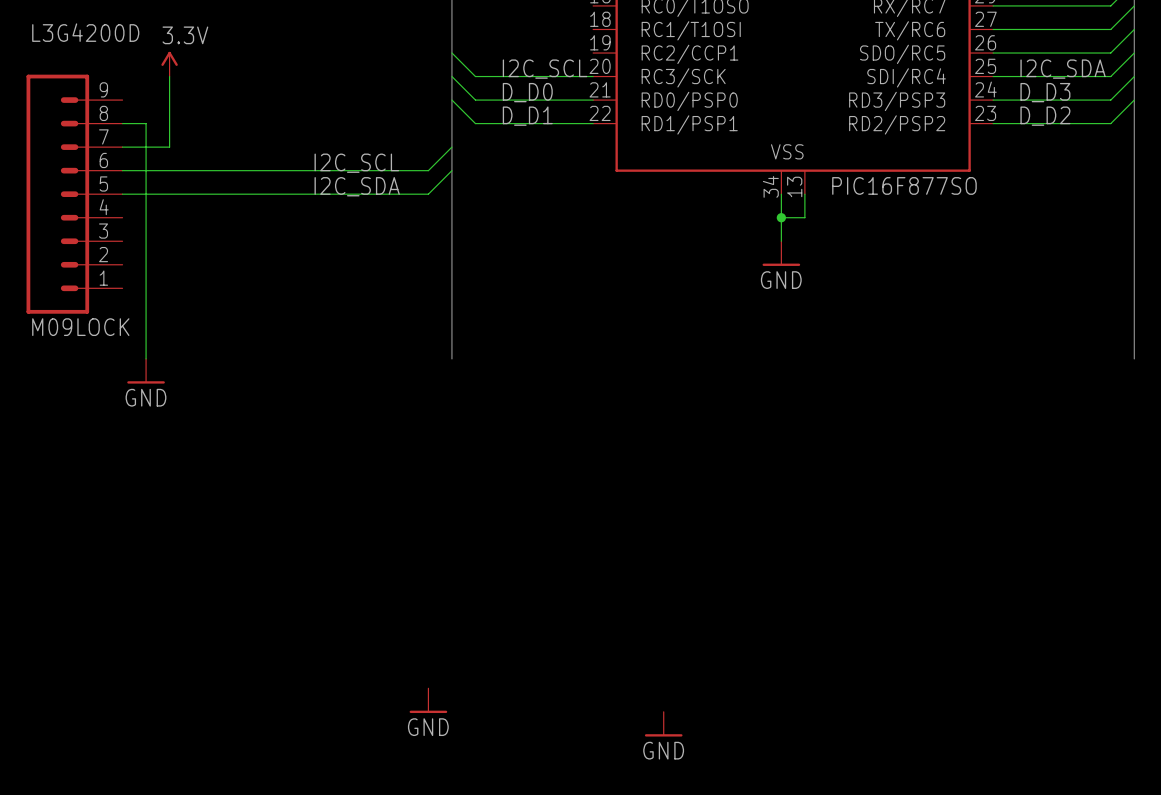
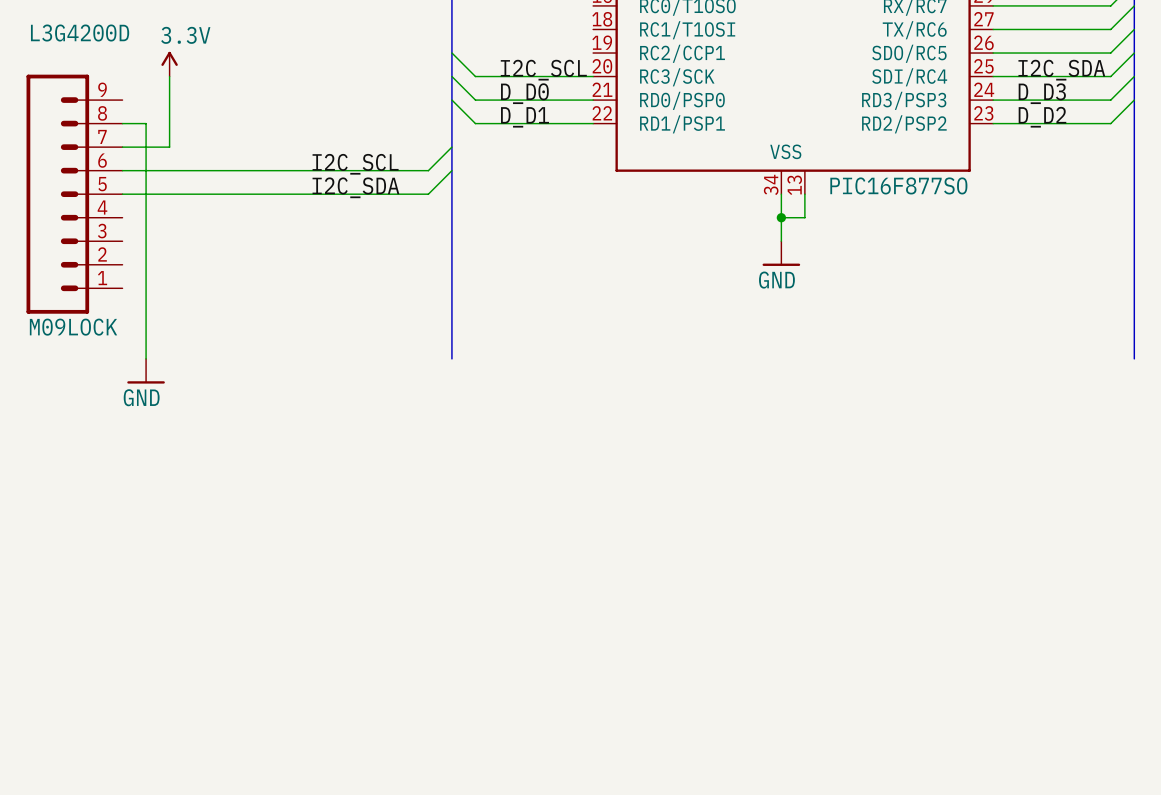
power symbol: GND (428, 700) -> none
power symbol: GND (663, 724) -> none

